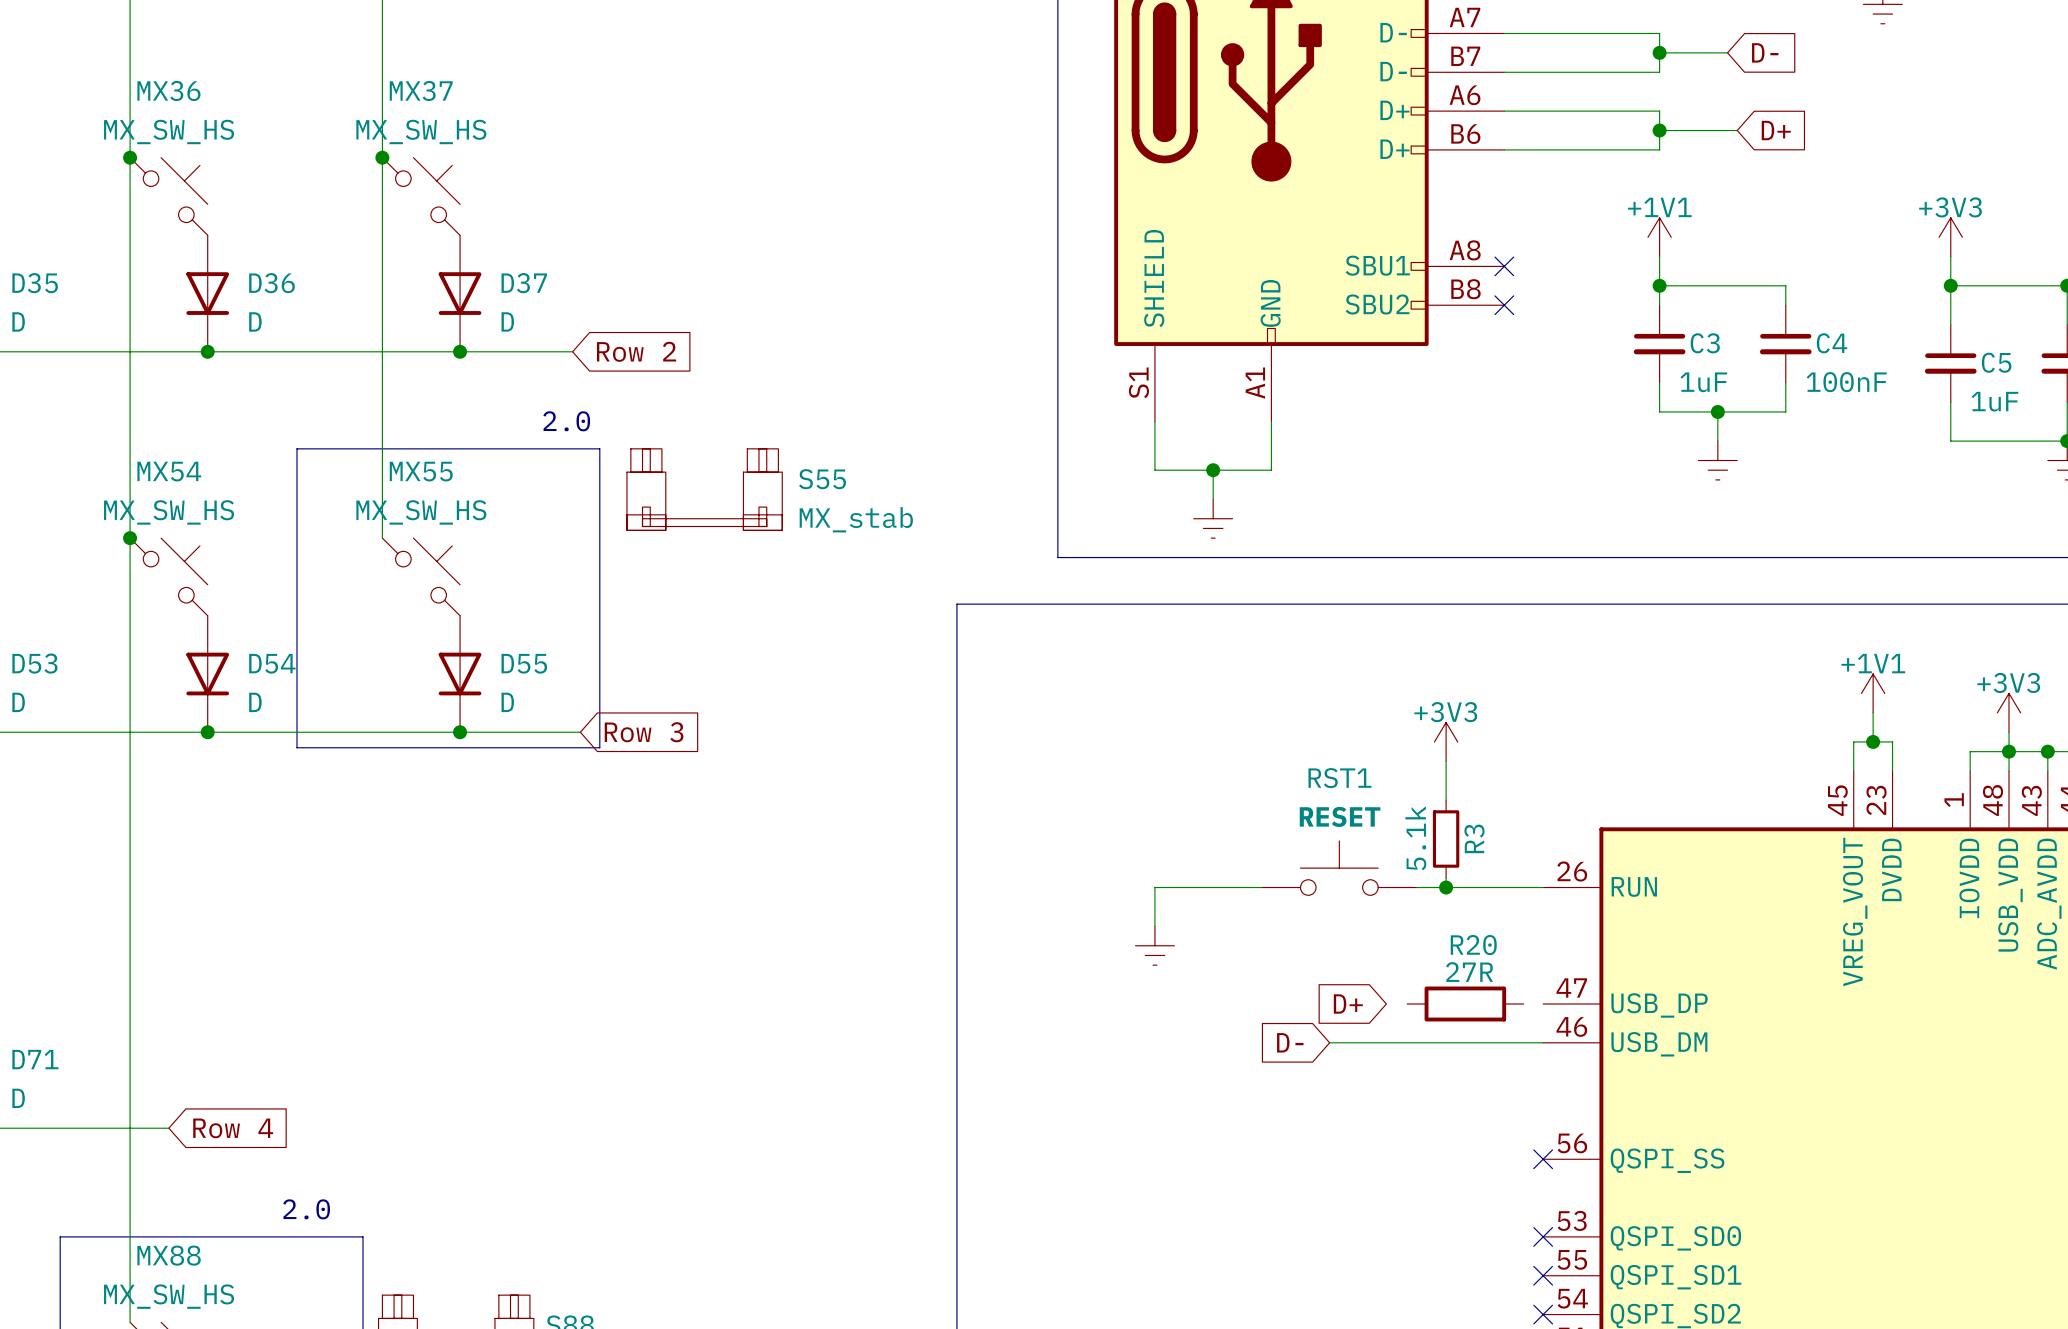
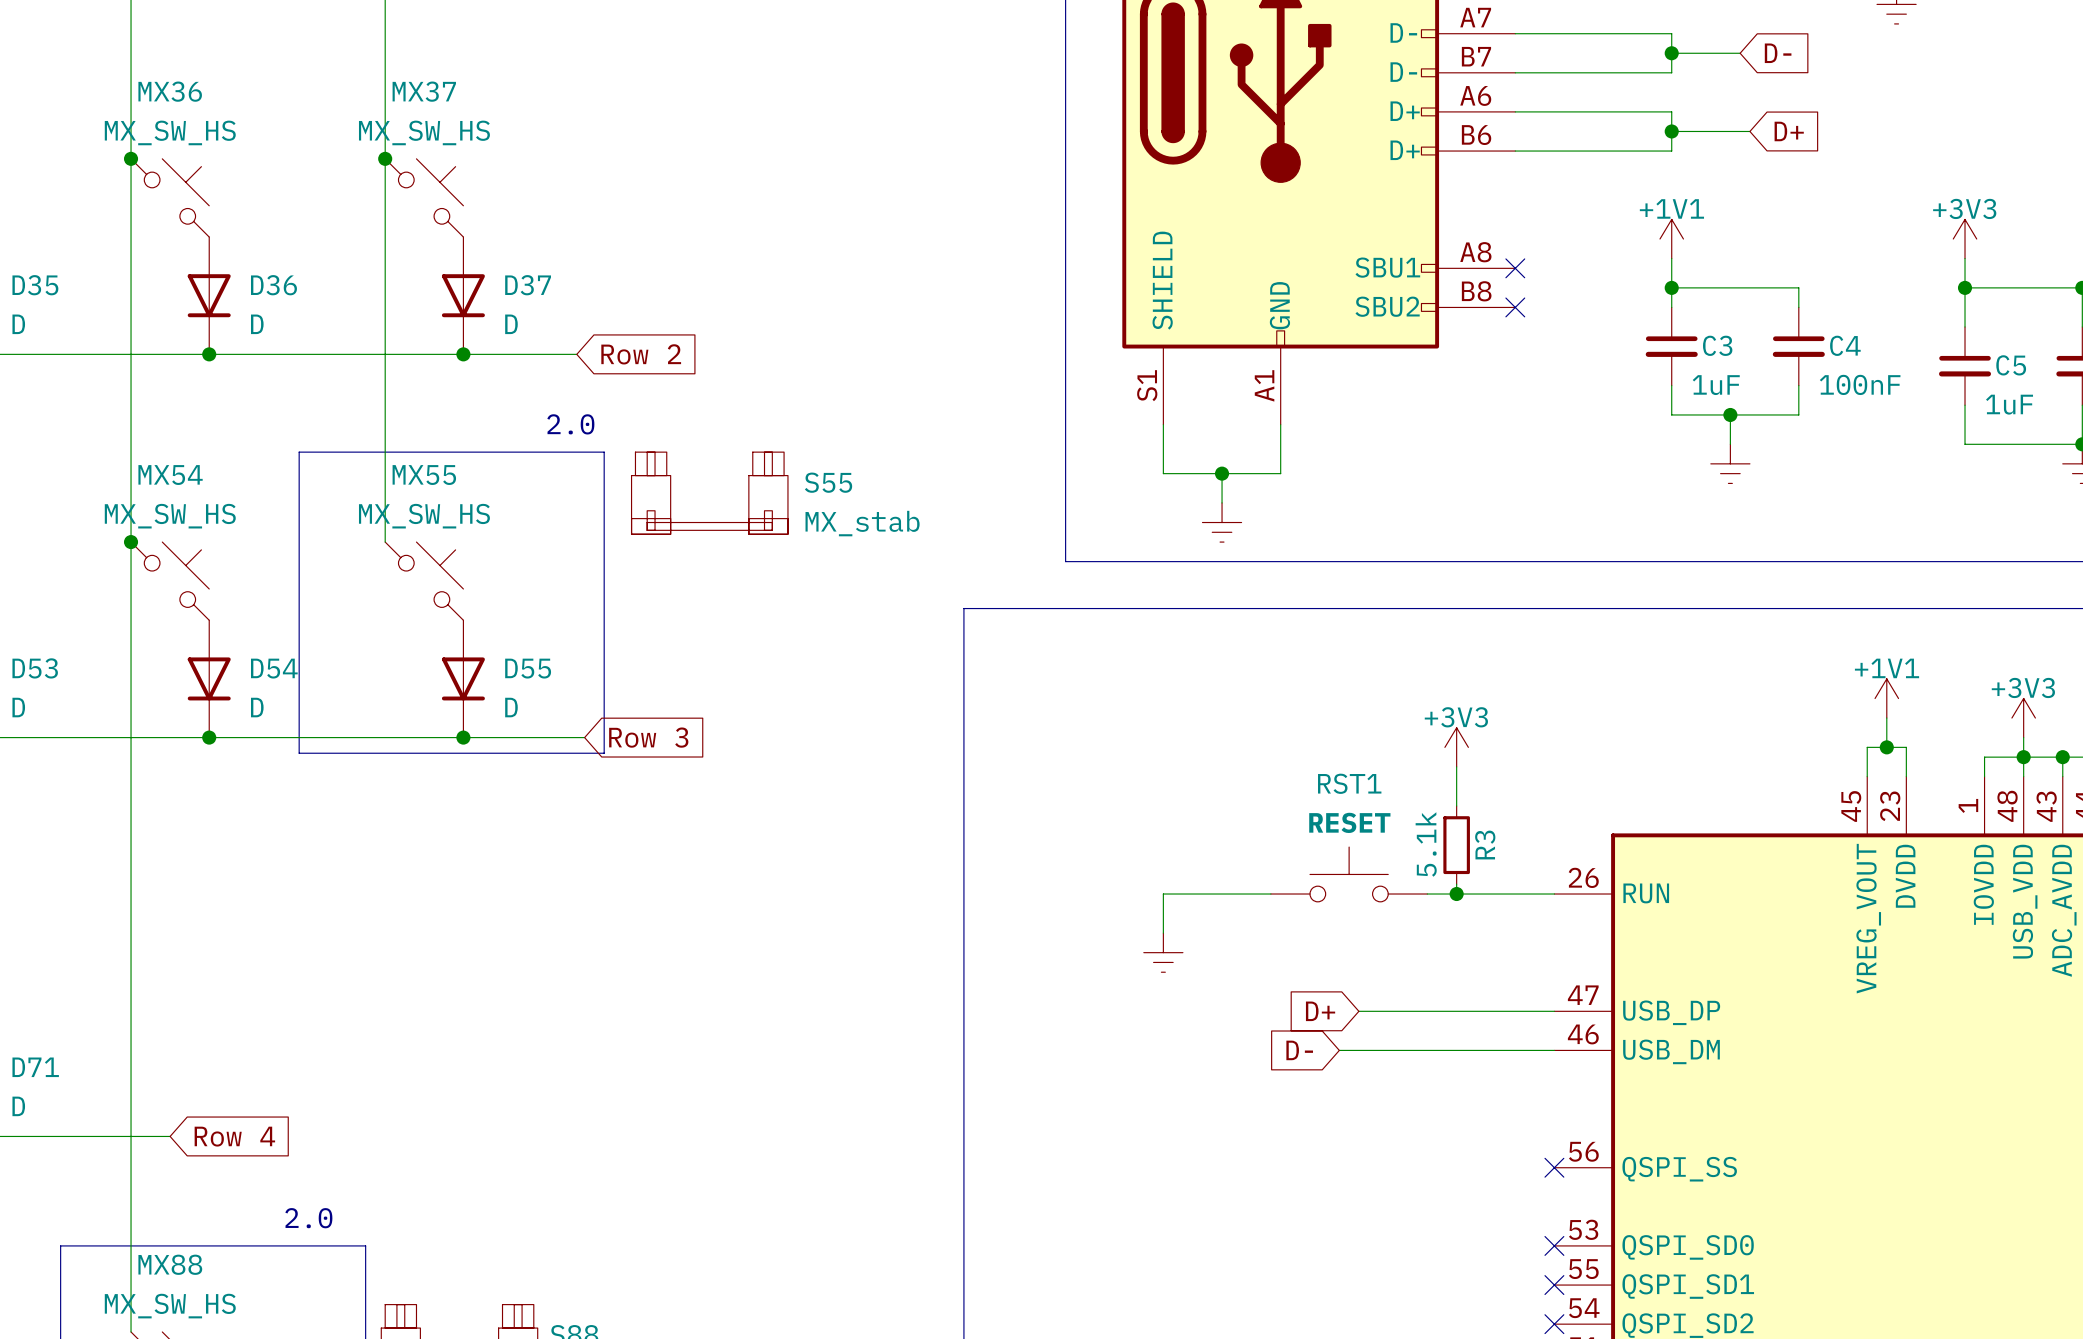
global label position: D+ (1348, 1003) -> D+ (1320, 1011)
wire: none -> (1358, 1011) (1554, 1011)
R20: 27R (1465, 1003) -> none

